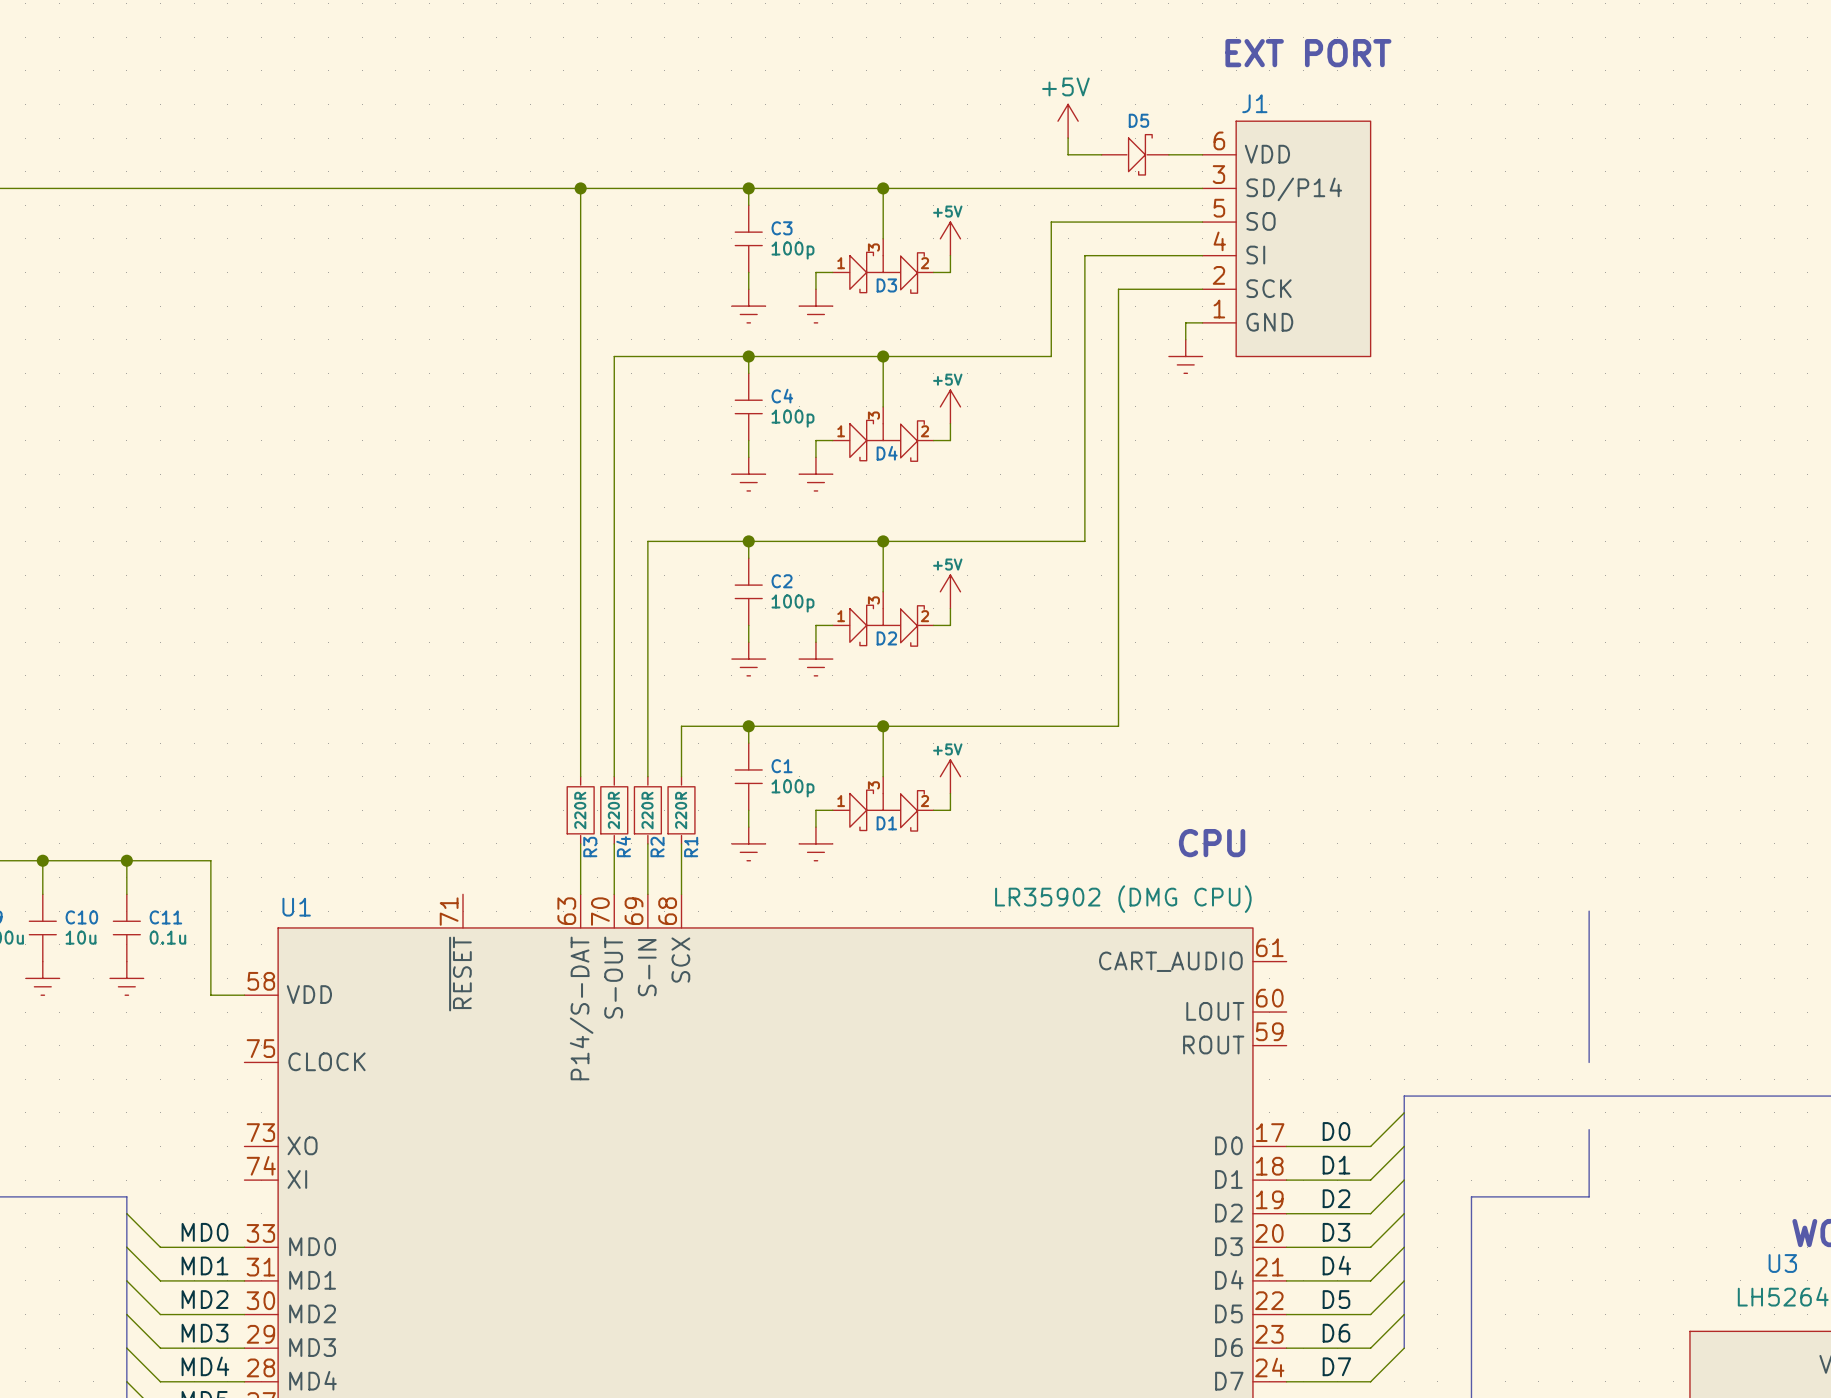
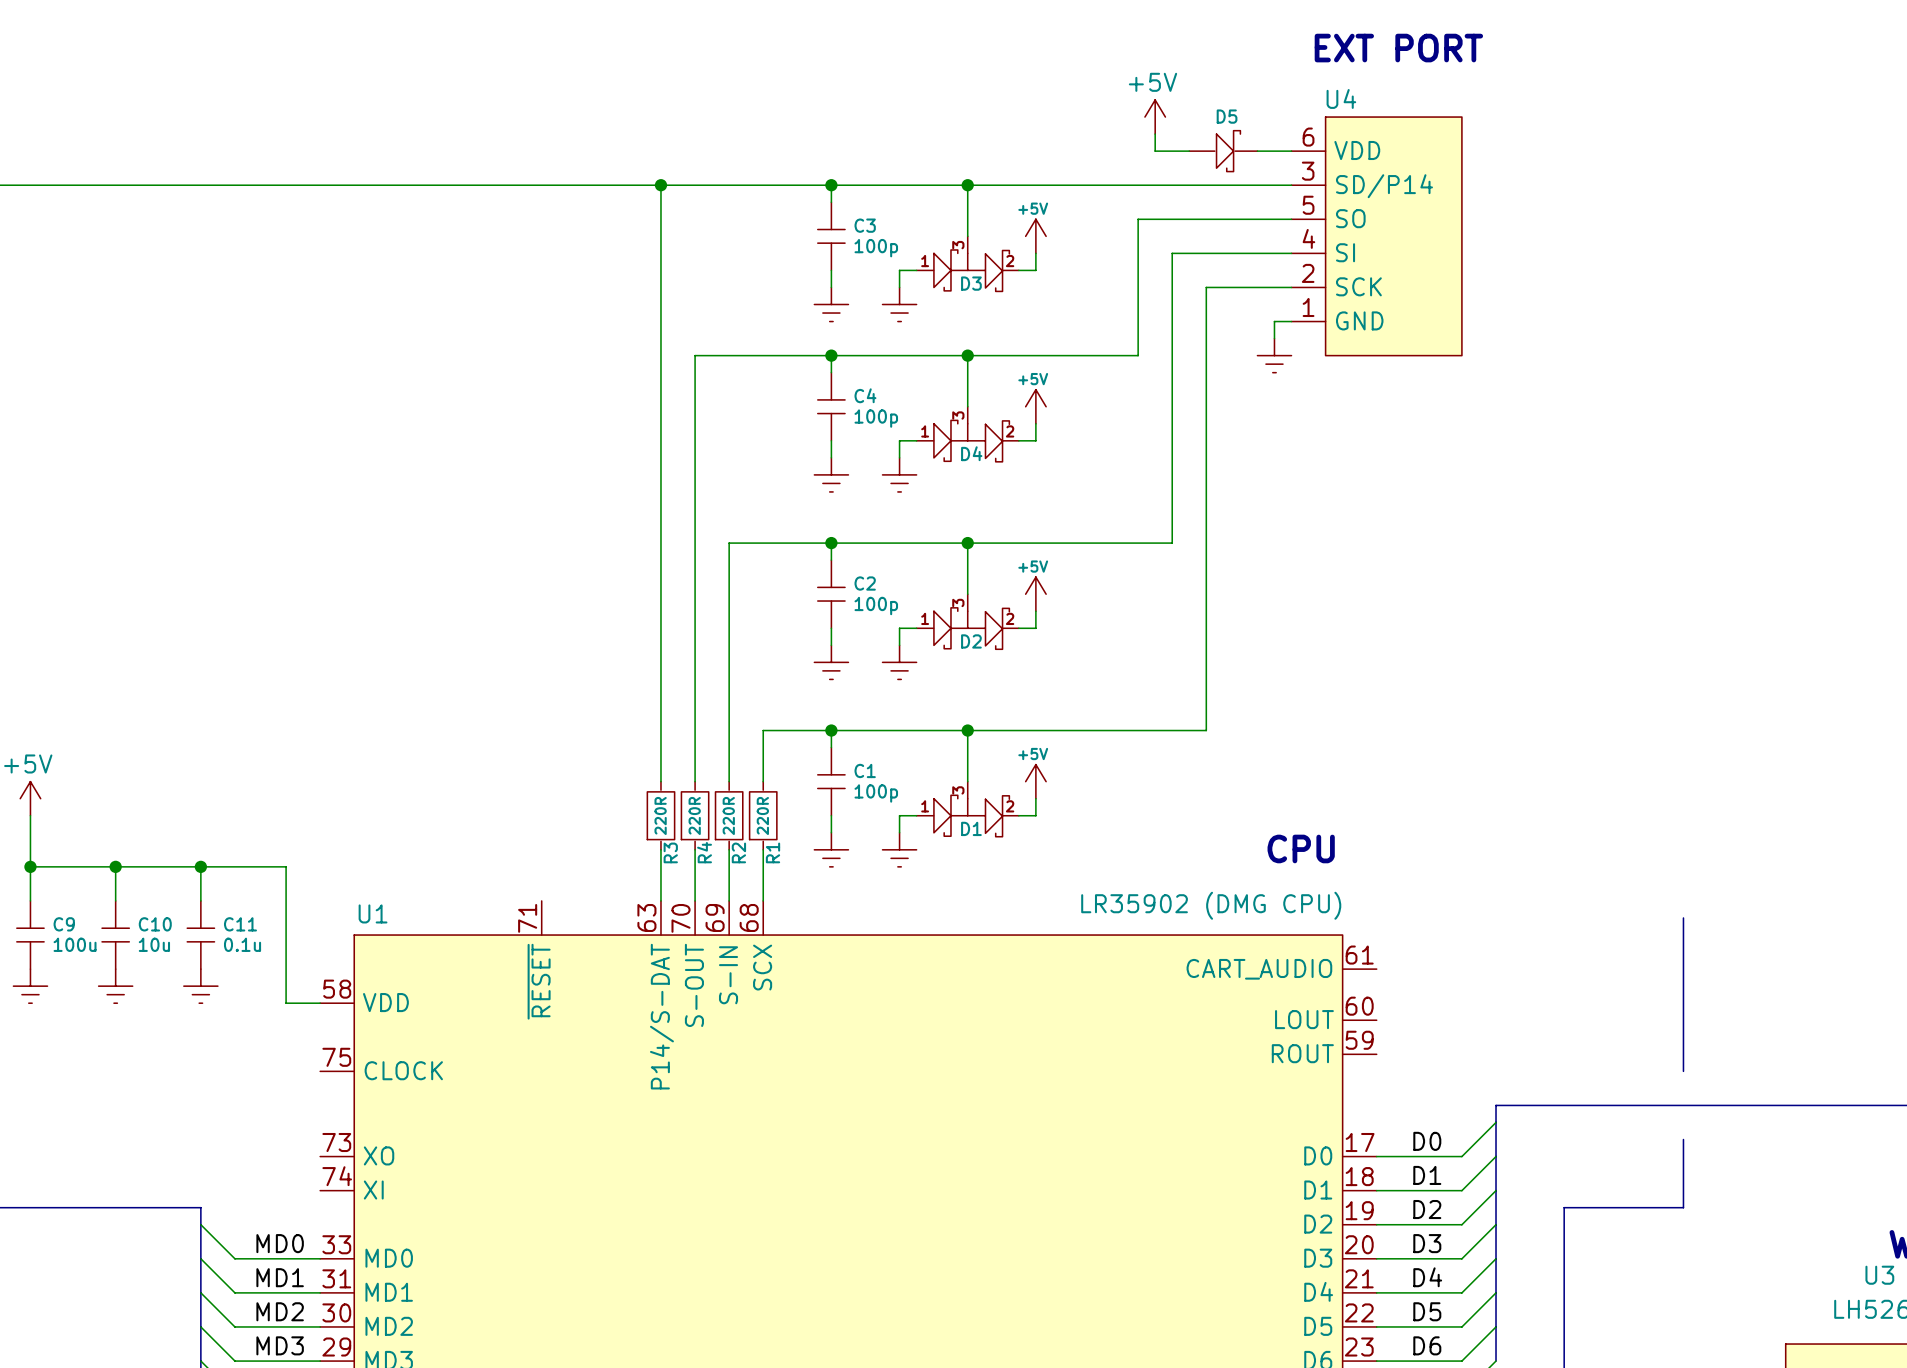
J1 name: J1 (1254, 103) -> U4 (1341, 98)

